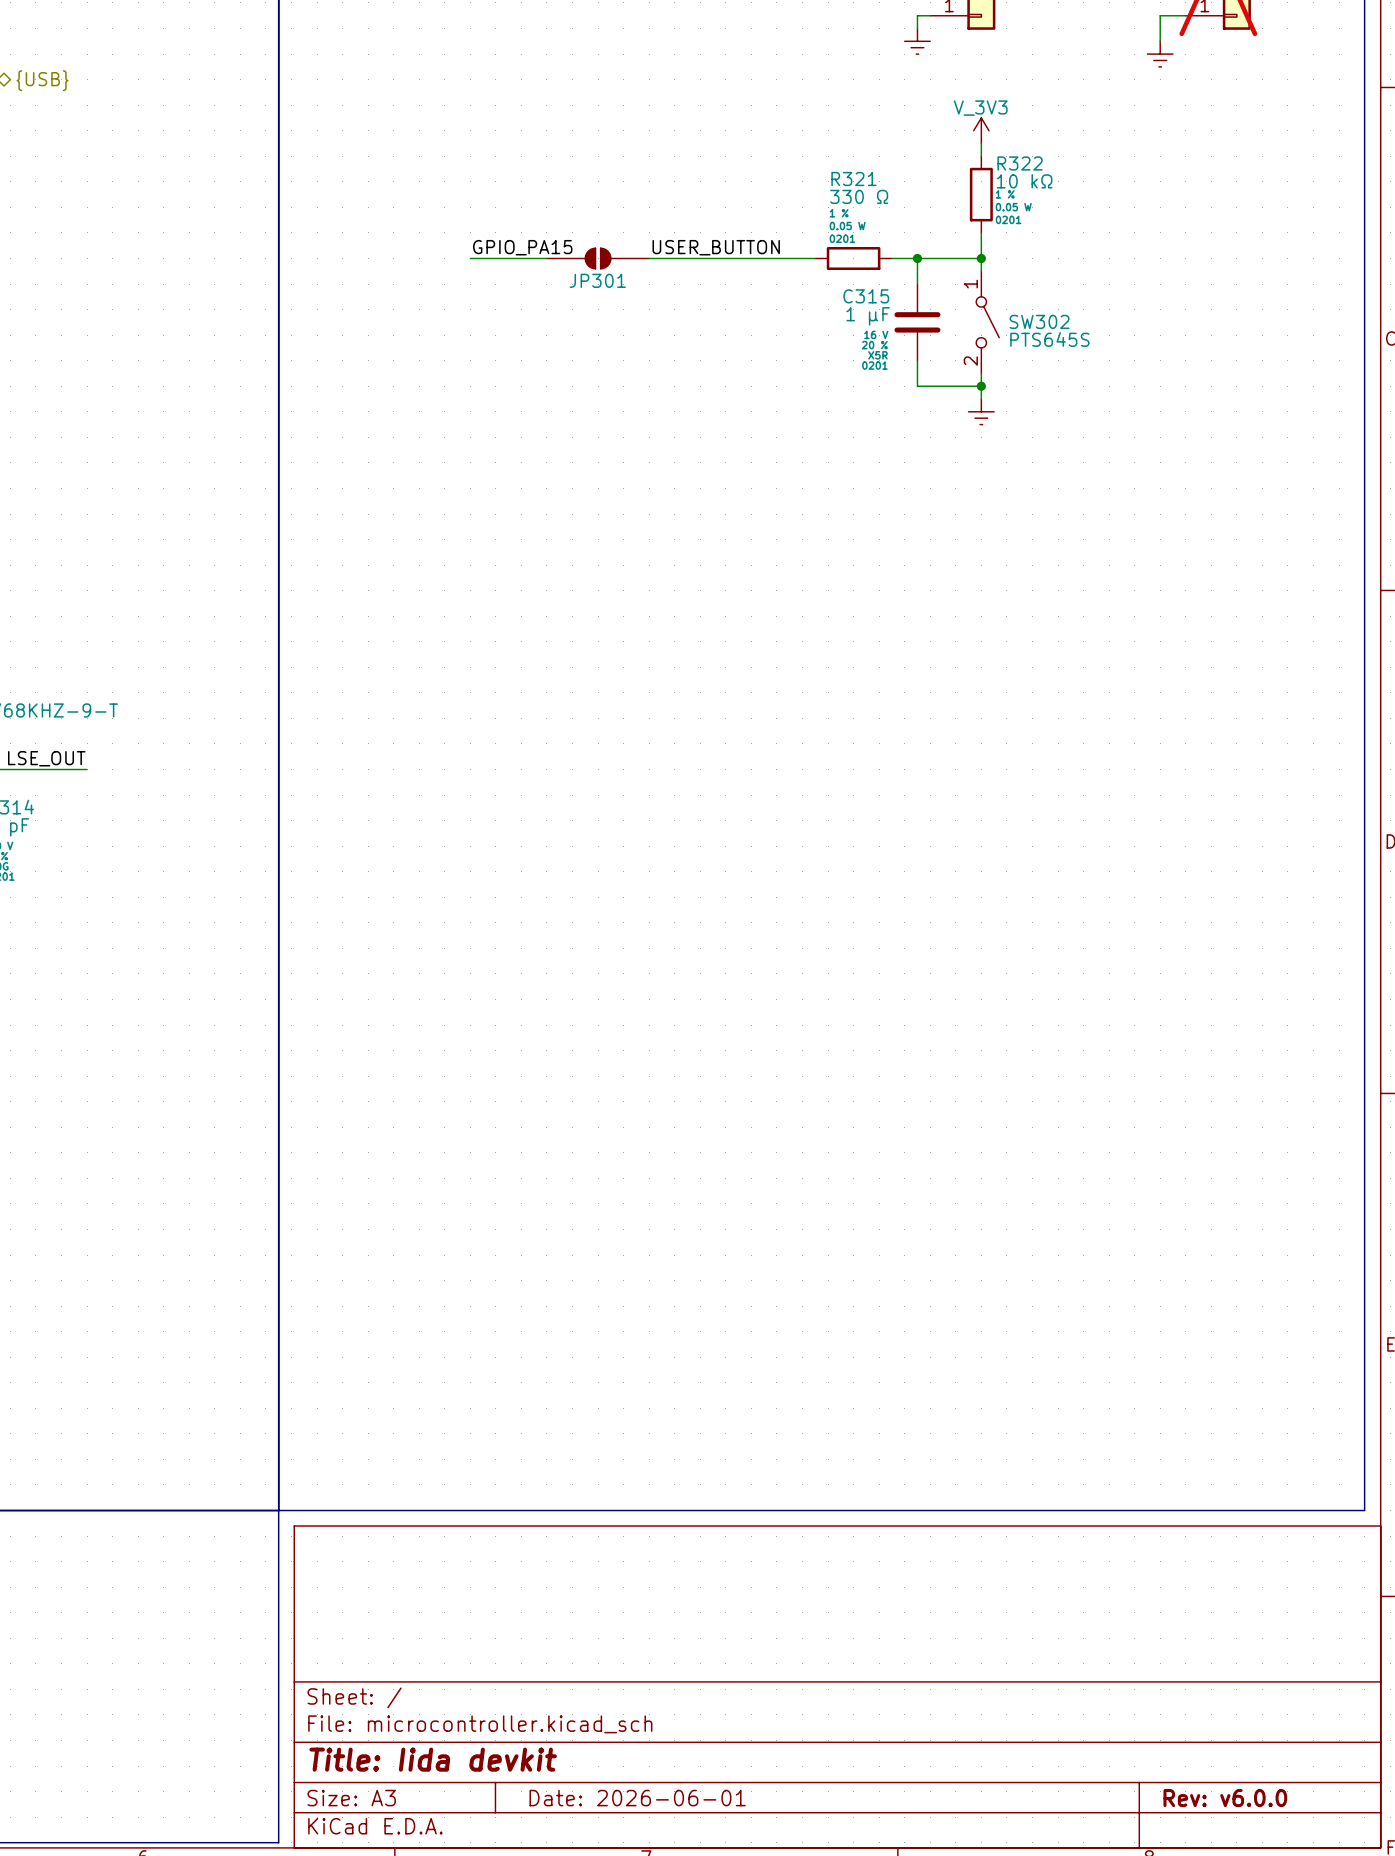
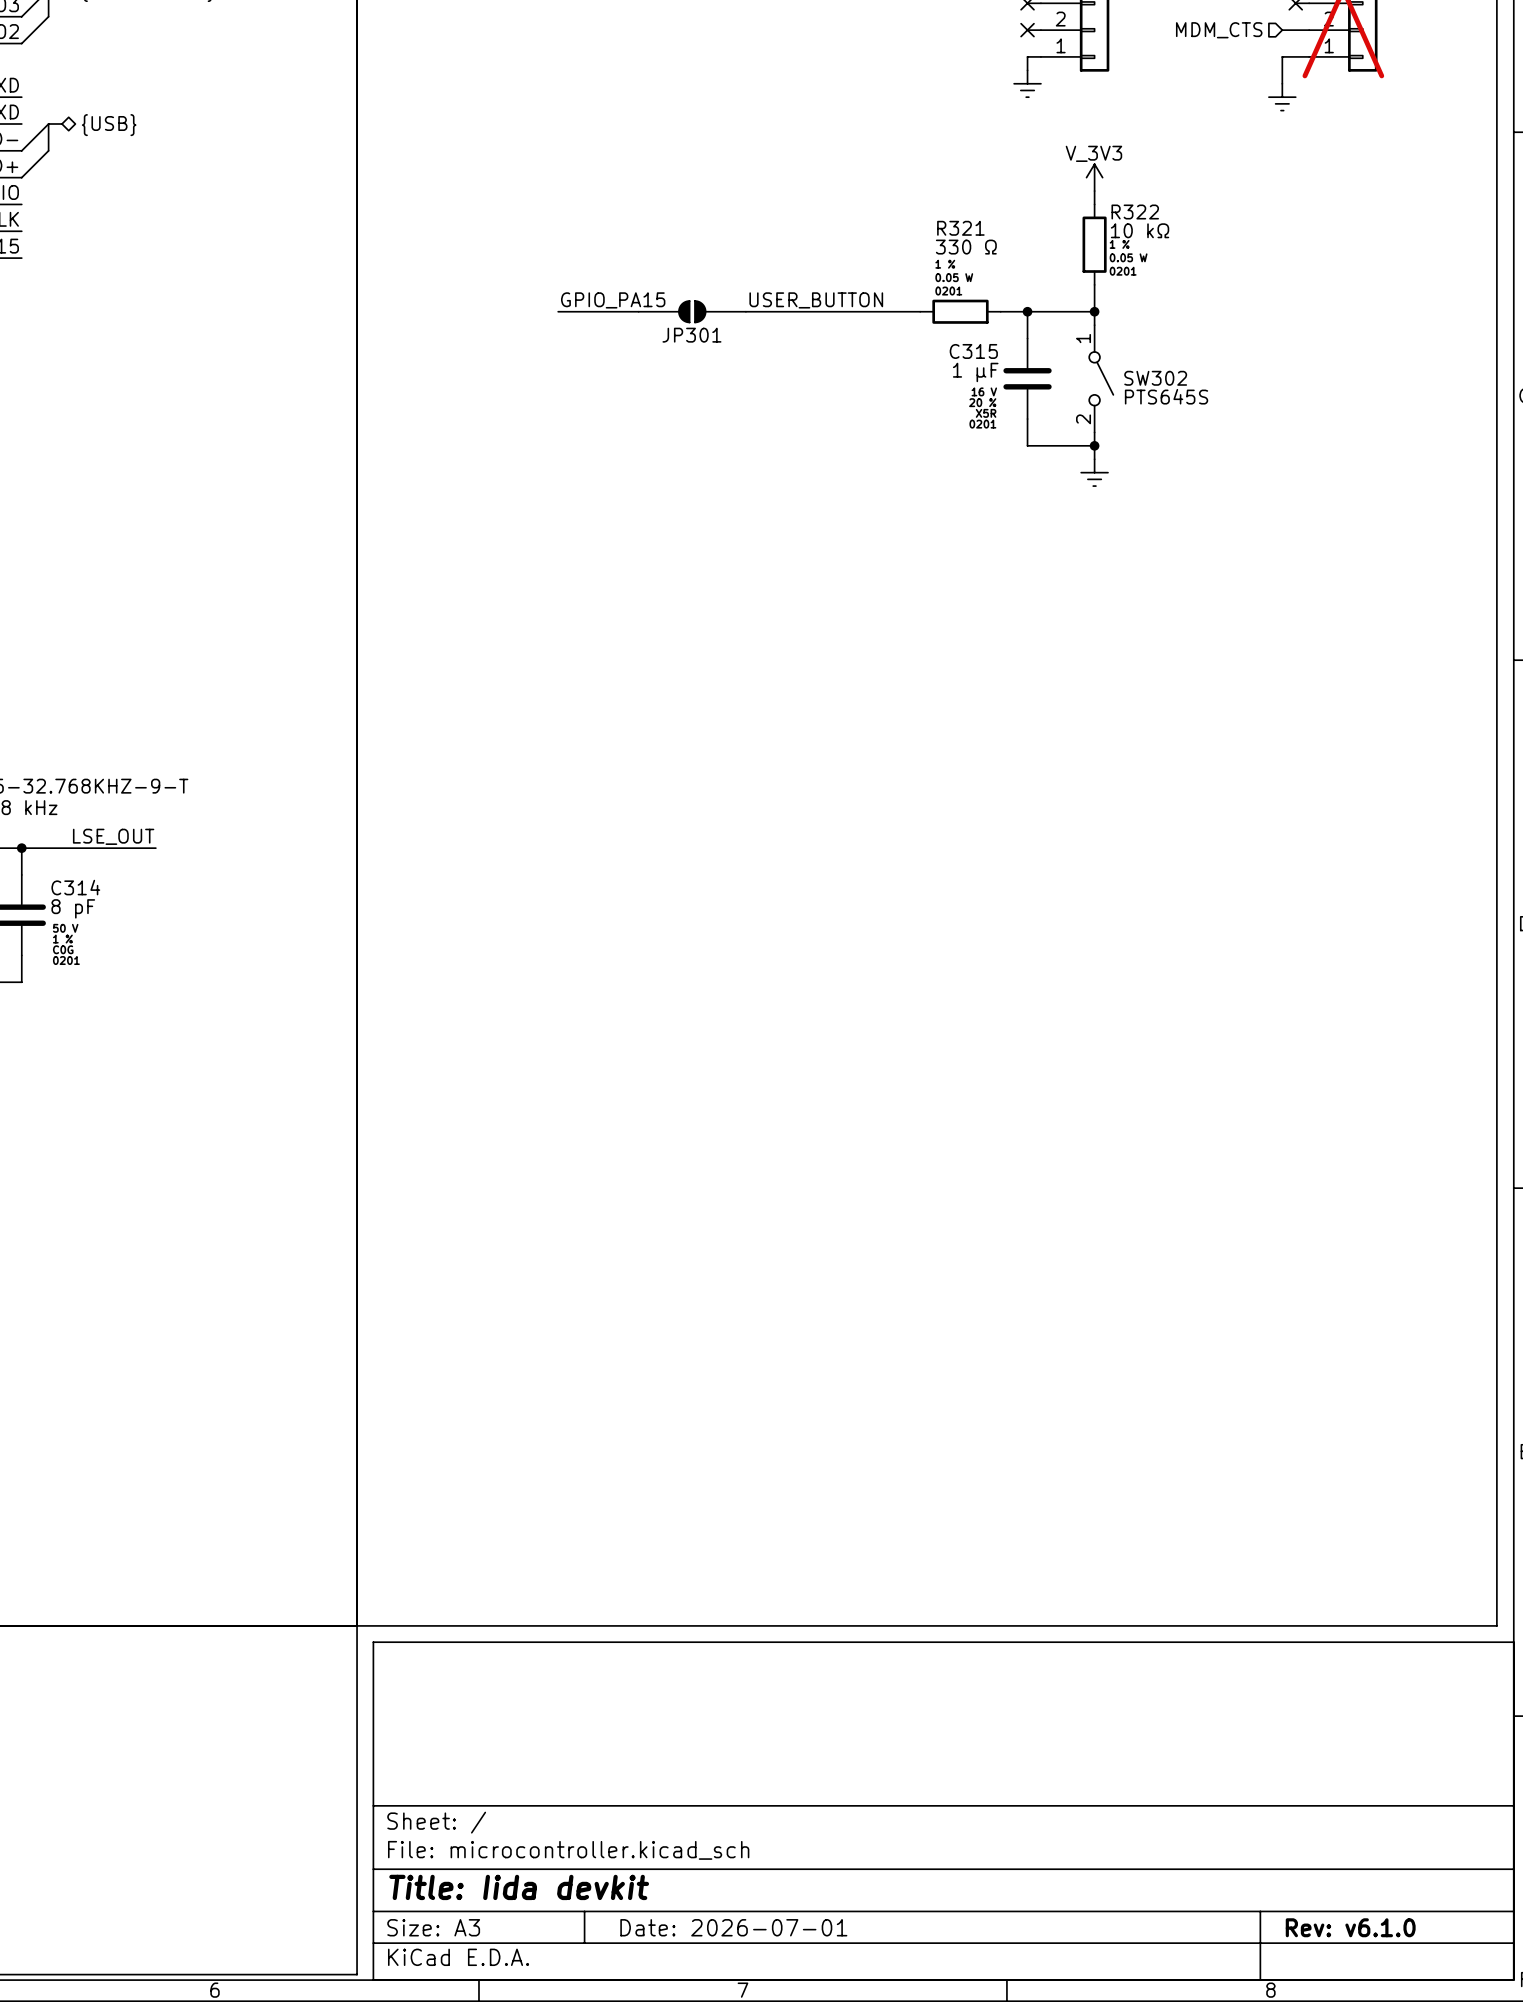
title block: Date: 2026-06-01 (637, 1798) -> Date: 2026-07-01 (733, 1927)
title block: Rev: v6.0.0 (1225, 1798) -> Rev: v6.1.0 (1350, 1927)

